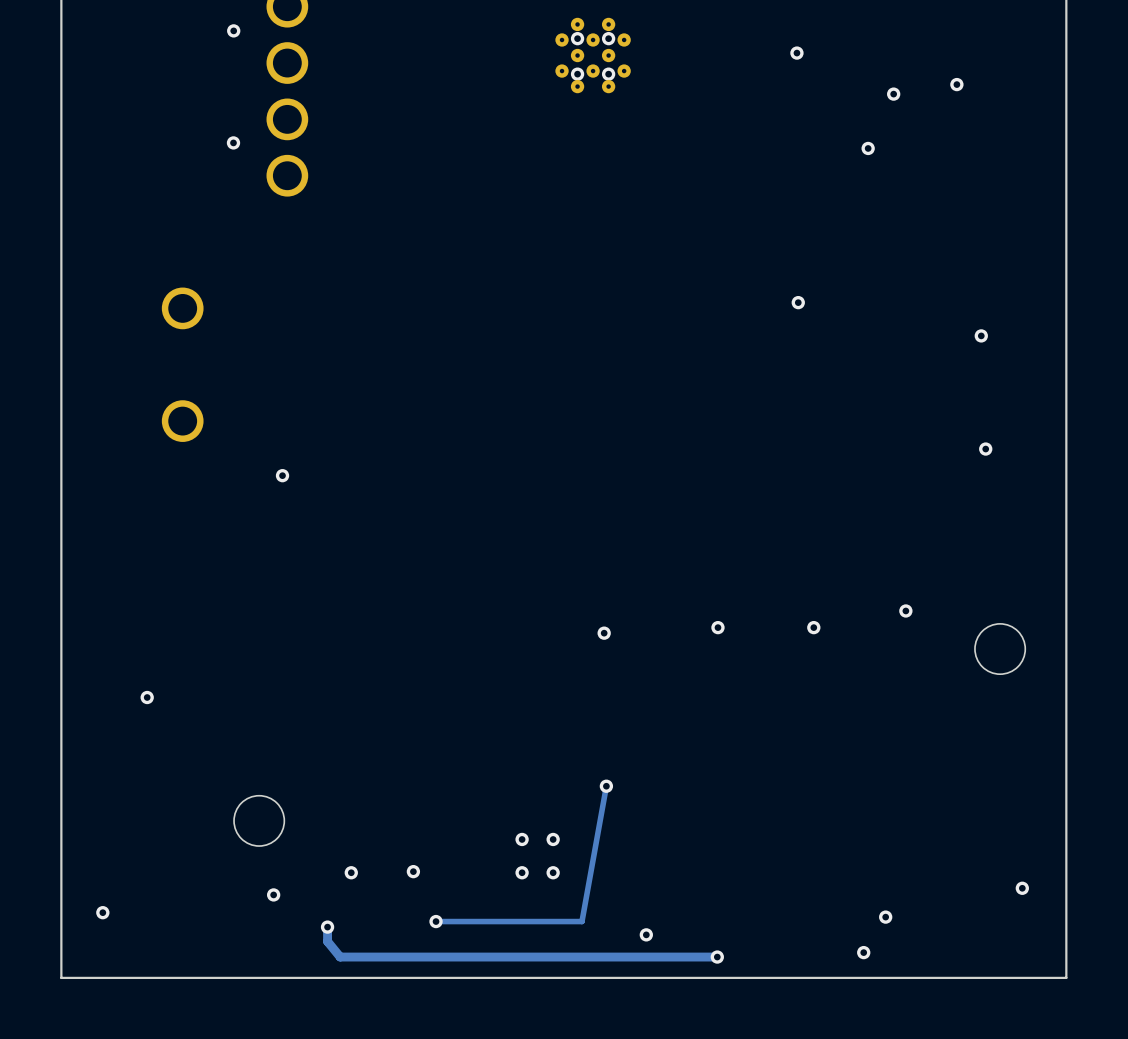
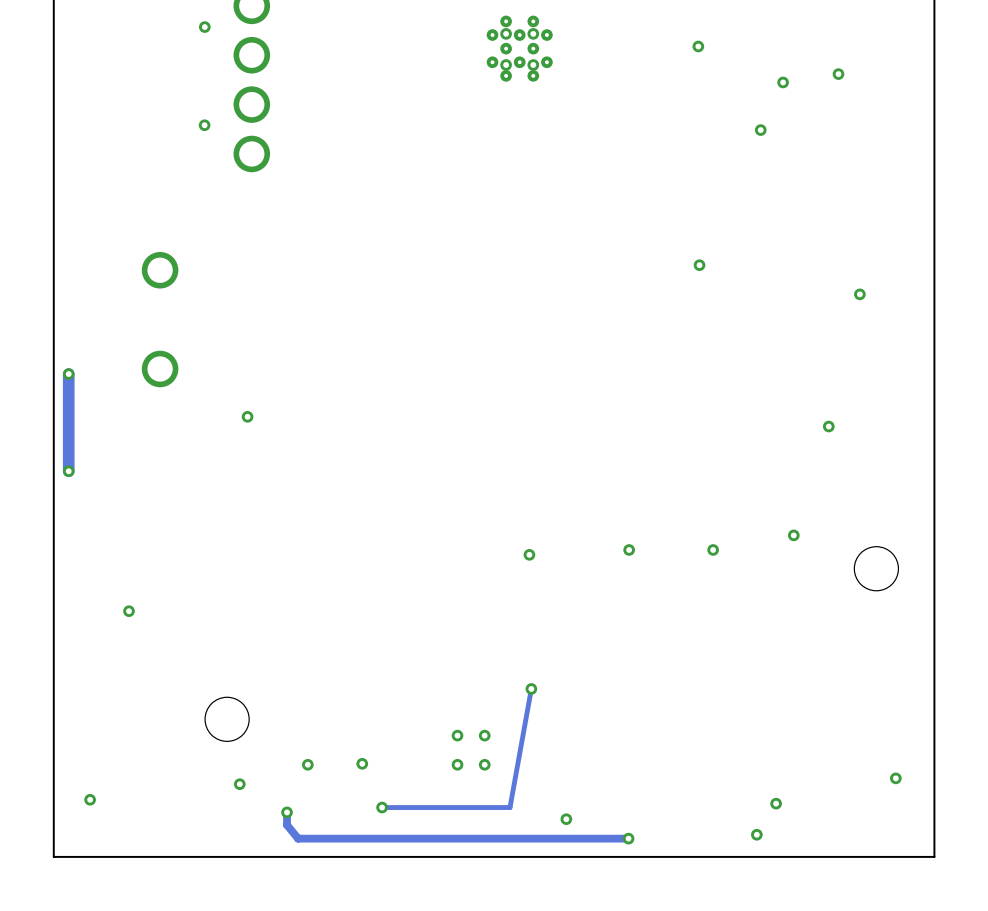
track: none -> (68, 374) (68, 471)
via: none -> (68, 374)
via position: (985, 449) -> (828, 426)
via: none -> (68, 471)

